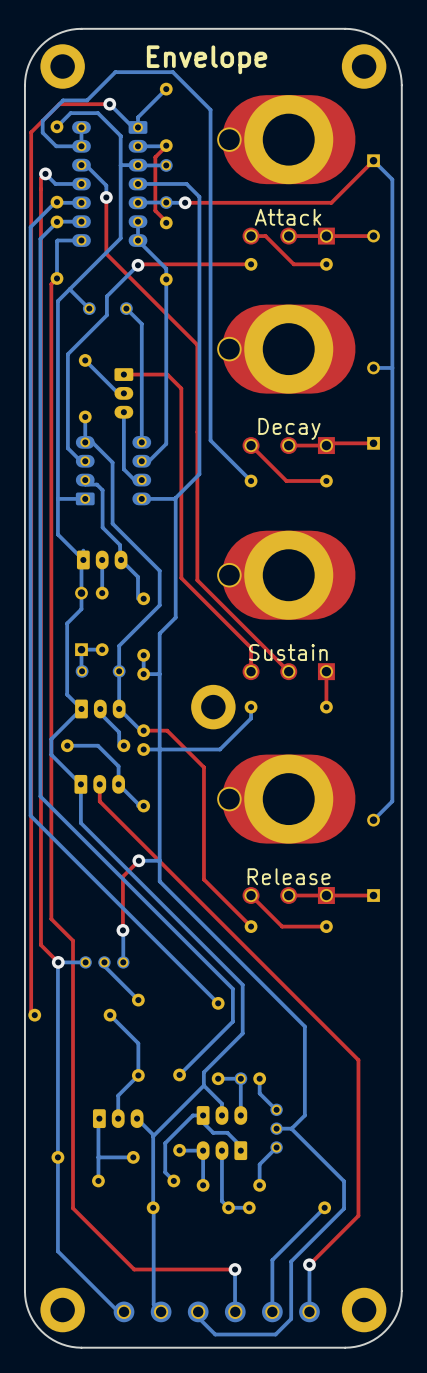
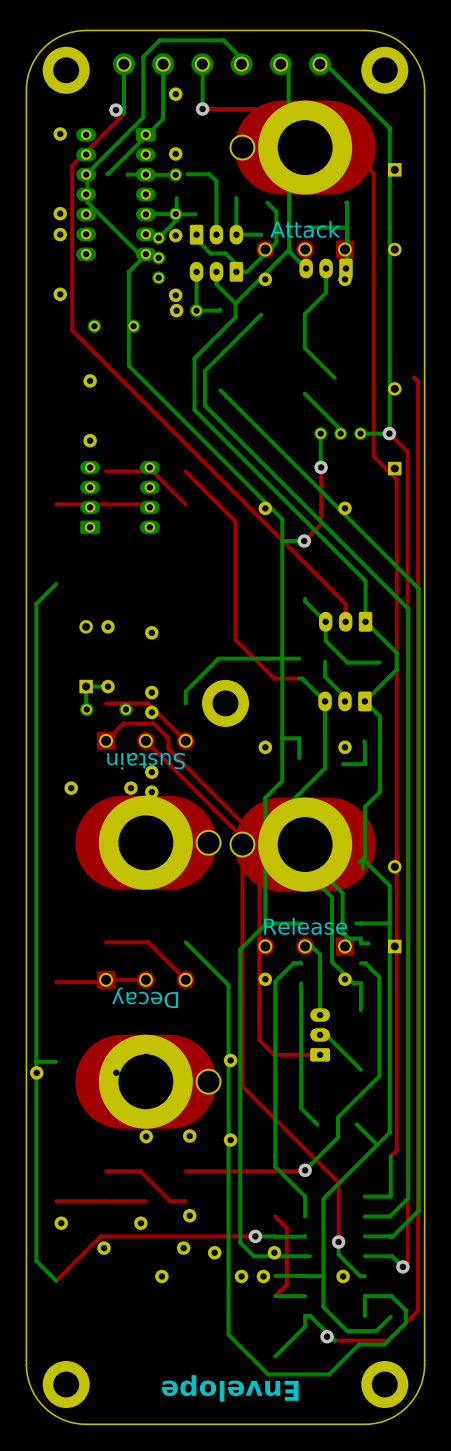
text: Envelope (207, 59) -> none
bottom track: none -> (123, 64) (123, 114)
bottom track: none -> (163, 64) (163, 119) (107, 173)
bottom track: none -> (202, 64) (202, 109)
part: none -> (221, 64)
bottom track: none -> (241, 64) (241, 58) (223, 40) (159, 40) (143, 56) (143, 117) (87, 173) (87, 202) (143, 257)
bottom track: none -> (280, 64) (288, 72) (289, 251) (306, 268)
bottom track: none -> (319, 64) (325, 64) (389, 128) (389, 433) (360, 433)
bottom track: (166, 89) (138, 117) (138, 127) (133, 127) (109, 104) -> none
top track: none -> (202, 109) (309, 109) (373, 173) (373, 456) (396, 479) (396, 1150) (390, 1156)
via: none -> (202, 109)
top track: (109, 104) (59, 104) (31, 132) (31, 1011) -> none
top track: none -> (123, 114) (72, 165) (72, 330) (345, 603) (345, 621)
bottom track: (56, 126) (70, 113) (97, 113) (121, 136) (120, 238) (57, 301) (57, 534) (83, 559) (83, 550) -> none
bottom track: (81, 127) (81, 146) (56, 146) (42, 132) (42, 120) (63, 100) (87, 100) (115, 72) (172, 72) (210, 109) (210, 440) (251, 481) -> none
bottom track: (166, 146) (138, 146) -> none
top track: (166, 146) (155, 157) (155, 210) (166, 221) -> none
bottom track: (373, 160) (392, 179) (392, 801) (373, 820) -> none
top track: (373, 160) (331, 202) (185, 202) -> none
bottom track: none -> (187, 174) (209, 174) (216, 181) (216, 234)
bottom track: (81, 165) (85, 165) (106, 185) (106, 197) -> none
bottom track: (45, 173) (55, 183) (81, 183) -> none
top track: (45, 173) (40, 178) (40, 945) (57, 962) -> none
via: (45, 173) -> none
bottom track: (133, 183) (186, 183) (199, 196) (199, 474) (174, 498) (141, 498) -> none
bottom track: none -> (176, 197) (176, 220) (158, 237)
bottom track: none -> (236, 197) (236, 234) (261, 234)
bottom track: none -> (267, 202) (276, 211) (276, 242) (247, 271) (236, 271) (236, 264) (225, 253) (210, 253) (196, 239) (196, 234)
bottom track: none -> (345, 202) (345, 268)
top track: (106, 197) (106, 253) (197, 344) (197, 580) (288, 671) -> none
via: (106, 197) -> none
bottom track: (81, 202) (55, 202) (30, 227) (30, 815) (218, 1003) -> none
via: (185, 202) -> none
bottom track: none -> (346, 227) (310, 227)
bottom track: (81, 221) (57, 221) (40, 238) (40, 796) (232, 988) (232, 1021) (179, 1074) -> none
bottom track: (138, 221) (138, 240) (166, 268) (166, 443) (148, 461) (142, 462) -> none
part: none -> (216, 234)
top track: (251, 236) (265, 236) (293, 264) (326, 264) -> none
bottom track: none -> (289, 249) (235, 303)
top track: (373, 236) (288, 236) -> none
bottom track: (81, 240) (56, 241) (56, 278) -> none
bottom track: none -> (158, 257) (142, 257) (128, 271) (128, 365) (282, 519) (282, 781) (265, 797) (265, 924)
part: none -> (158, 257)
bottom track: none -> (326, 268) (326, 292) (304, 314) (304, 347) (334, 377)
part: none -> (326, 268)
bottom track: none -> (196, 271) (196, 310) (220, 309)
bottom track: none -> (216, 271) (216, 284) (235, 303)
part: none -> (216, 271)
top track: (251, 264) (138, 265) -> none
bottom track: (138, 265) (106, 296) (106, 315) (67, 354) (67, 448) (80, 461) (85, 461) -> none
via: (138, 265) -> none
top track: (56, 278) (51, 284) (51, 919) (73, 940) (73, 1208) (134, 1269) (235, 1269) -> none
bottom track: none -> (235, 303) (235, 317) (194, 358) (194, 409) (365, 580) (365, 621) (396, 652) (396, 669) (364, 701) (380, 716) (380, 791) (364, 806) (364, 856) (359, 861)
bottom track: (69, 289) (89, 308) -> none
part: none -> (186, 310)
bottom track: none -> (261, 314) (204, 370) (204, 405) (408, 608) (408, 1198) (390, 1216) (364, 1216)
bottom track: (126, 308) (141, 323) (141, 442) -> none
top track: none -> (414, 377) (418, 381)
bottom track: (85, 360) (118, 393) (123, 393) -> none
top track: none -> (418, 381) (418, 1310) (388, 1340) (335, 1340)
bottom track: (392, 367) (373, 367) -> none
bottom track: none -> (220, 390) (418, 588) (418, 1210) (392, 1237) (364, 1236)
bottom track: none -> (304, 393) (340, 429) (340, 433)
top track: (123, 374) (167, 374) (181, 388) (181, 578) (251, 647) (251, 671) -> none
part: (286, 379) -> none
part: (123, 393) -> none
top track: none -> (389, 433) (407, 451) (407, 1262) (402, 1266)
bottom track: none -> (320, 433) (321, 467)
part: none -> (340, 433)
via: none -> (389, 433)
bottom track: (123, 412) (123, 469) (134, 480) (141, 480) -> none
bottom track: (85, 416) (85, 442) (92, 442) (112, 462) (112, 523) (159, 570) (159, 605) (119, 645) (119, 708) (140, 730) (143, 730) -> none
top track: none -> (321, 467) (321, 524) (304, 541)
via: none -> (321, 467)
top track: (373, 443) (288, 445) -> none
top track: (251, 445) (286, 481) (326, 481) -> none
top track: none -> (106, 471) (152, 471) (185, 504)
top track: none -> (185, 471) (235, 521) (235, 639) (274, 678) (299, 678)
top track: none -> (145, 504) (56, 504)
bottom track: (78, 480) (85, 480) (85, 484) (96, 484) (102, 490) (102, 527) (120, 545) (120, 559) (138, 576) (138, 598) -> none
bottom track: (175, 497) (175, 617) (159, 633) (159, 881) (304, 1026) (304, 1115) (291, 1128) (276, 1128) -> none
bottom track: (89, 498) (57, 498) -> none
bottom track: none -> (304, 541) (282, 541)
via: none -> (304, 541)
bottom track: none -> (56, 583) (36, 603) (36, 1260) (56, 1280)
bottom track: (86, 557) (81, 561) (81, 609) (67, 623) (67, 694) (81, 708) (51, 739) (51, 754) (80, 784) (80, 823) (242, 984) (242, 1033) (203, 1072) (203, 1085) -> none
bottom track: (102, 559) (102, 593) -> none
part: (102, 559) -> none
bottom track: none -> (305, 598) (305, 601) (325, 621) (325, 640) (347, 662) (379, 662)
part: none -> (345, 621)
part: (286, 605) -> none
bottom track: none -> (299, 658) (218, 658) (185, 691) (185, 703)
bottom track: none -> (325, 661) (325, 676) (344, 696) (344, 701)
bottom track: none -> (299, 678) (302, 678) (325, 701) (325, 768) (282, 810) (282, 847) (332, 897) (332, 961) (353, 983) (360, 983) (360, 1010)
bottom track: (143, 655) (143, 674) (159, 674) -> none
part: none -> (344, 701)
top track: none -> (106, 703) (148, 703) (185, 740)
top track: (326, 671) (326, 707) -> none
bottom track: none -> (282, 738) (299, 738) (299, 758)
top track: none -> (106, 740) (123, 723) (153, 723) (168, 738) (168, 748) (259, 839) (259, 1040) (274, 1054) (320, 1054)
top track: none -> (145, 740) (242, 837) (242, 1086) (338, 1182) (338, 1242)
bottom track: none -> (364, 741) (364, 764) (342, 764)
part position: (213, 707) -> (225, 703)
bottom track: (251, 707) (251, 718) (219, 749) (143, 749) -> none
bottom track: (100, 708) (100, 713) (119, 732) (119, 746) -> none
part: (100, 708) -> none
top track: (143, 730) (167, 730) (203, 767) (203, 879) (251, 926) -> none
bottom track: (67, 745) (97, 745) (118, 766) (118, 784) (138, 806) -> none
part: none -> (148, 810)
bottom track: none -> (305, 817) (305, 840) (324, 859) (324, 874) (342, 893) (342, 932) (348, 938) (360, 938) (360, 943) (368, 943)
top track: (99, 784) (99, 801) (358, 1060) (358, 1215) (309, 1264) -> none
part: (99, 784) -> none
bottom track: none -> (362, 868) (362, 858) (389, 885) (389, 1132) (323, 1198) (323, 1306) (347, 1331) (376, 1331) (390, 1316)
top track: (138, 860) (122, 876) (122, 930) -> none
via: (138, 860) -> none
bottom track: (159, 860) (138, 860) -> none
bottom track: none -> (301, 923) (266, 923) (240, 949) (240, 1242) (253, 1256) (309, 1256)
bottom track: none -> (389, 923) (356, 923)
top track: none -> (106, 942) (148, 942) (185, 979)
bottom track: none -> (185, 942) (228, 985) (228, 1334) (268, 1374) (329, 1374) (358, 1344) (384, 1344) (405, 1322) (405, 1310) (391, 1296) (364, 1296) (364, 1316)
bottom track: none -> (301, 943) (308, 943) (320, 954) (320, 1015)
top track: (251, 895) (282, 926) (326, 926) -> none
top track: (373, 895) (288, 895) -> none
bottom track: none -> (300, 962) (293, 963) (275, 981) (275, 1166) (305, 1196) (305, 1216)
bottom track: none -> (360, 963) (365, 963) (379, 976) (379, 1076) (338, 1117) (338, 1137) (305, 1170)
top track: none -> (145, 979) (56, 982)
bottom track: (122, 930) (123, 962) -> none
via: (122, 930) -> none
bottom track: none -> (301, 983) (301, 1108) (317, 1124)
via: (58, 962) -> none
bottom track: (85, 962) (57, 962) (57, 1251) (118, 1311) (124, 1311) -> none
bottom track: (104, 962) (104, 966) (138, 1000) -> none
part: (104, 962) -> none
bottom track: none -> (320, 1034) (326, 1034) (360, 1069)
part: none -> (320, 1034)
part: none -> (148, 1049)
bottom track: none -> (56, 1061) (36, 1061)
bottom track: (110, 1015) (138, 1043) (138, 1075) (118, 1095) (118, 1118) -> none
bottom track: none -> (356, 1124) (377, 1144)
part: (250, 1078) -> none
bottom track: (259, 1078) (259, 1093) (276, 1110) -> none
bottom track: (218, 1079) (240, 1078) (240, 1115) -> none
bottom track: (203, 1085) (153, 1136) -> none
bottom track: (203, 1085) (221, 1103) (221, 1115) -> none
bottom track: none -> (390, 1156) (390, 1195) (364, 1196)
top track: none -> (305, 1170) (185, 1171)
via: none -> (305, 1170)
top track: none -> (106, 1171) (140, 1171) (170, 1201) (185, 1201)
part: (221, 1115) -> none
bottom track: (99, 1118) (99, 1180) -> none
part: (118, 1118) -> none
bottom track: (137, 1118) (153, 1134) (153, 1304) (161, 1311) -> none
part: (276, 1128) -> none
bottom track: (291, 1128) (344, 1181) (344, 1208) (291, 1261) (291, 1318) (275, 1334) (215, 1334) (198, 1317) (198, 1311) -> none
top track: none -> (145, 1201) (56, 1201)
bottom track: (276, 1147) (259, 1164) (259, 1185) -> none
bottom track: (179, 1150) (203, 1150) (203, 1185) -> none
bottom track: (221, 1150) (221, 1201) (228, 1207) (249, 1207) -> none
part: (221, 1150) -> none
bottom track: (240, 1150) (240, 1146) (227, 1132) (213, 1132) (203, 1122) (203, 1115) (192, 1115) (165, 1143) (165, 1172) (173, 1180) -> none
top track: none -> (275, 1216) (286, 1227) (286, 1284) (275, 1296)
bottom track: (133, 1157) (98, 1157) -> none
top track: none -> (255, 1236) (100, 1236) (56, 1280)
via: none -> (255, 1236)
bottom track: none -> (305, 1236) (255, 1236)
bottom track: none -> (338, 1242) (338, 1254) (360, 1276) (364, 1276)
via: none -> (338, 1242)
bottom track: none -> (364, 1256) (392, 1256) (402, 1266)
via: none -> (402, 1266)
bottom track: none -> (323, 1275) (275, 1275)
bottom track: (325, 1208) (272, 1260) (272, 1311) -> none
bottom track: none -> (305, 1296) (275, 1296)
bottom track: (309, 1264) (309, 1311) -> none
bottom track: none -> (335, 1340) (310, 1316) (305, 1316) (305, 1326) (275, 1356)
bottom track: (235, 1269) (235, 1311) -> none
via: (235, 1269) -> none
part: (216, 1311) -> none
text: none -> Envelope (230, 1388)

